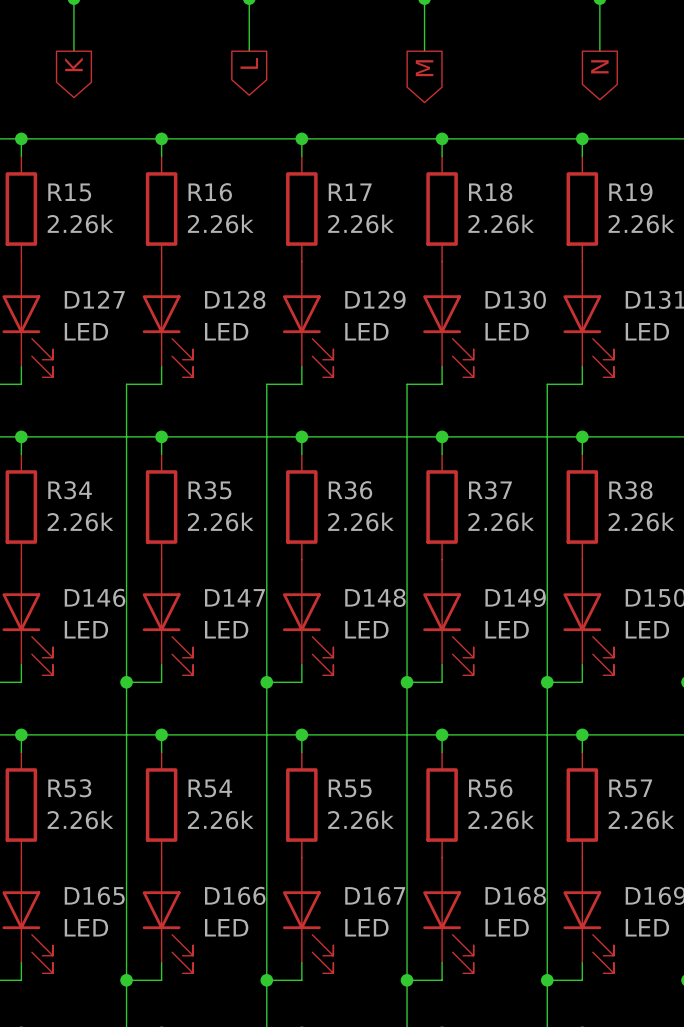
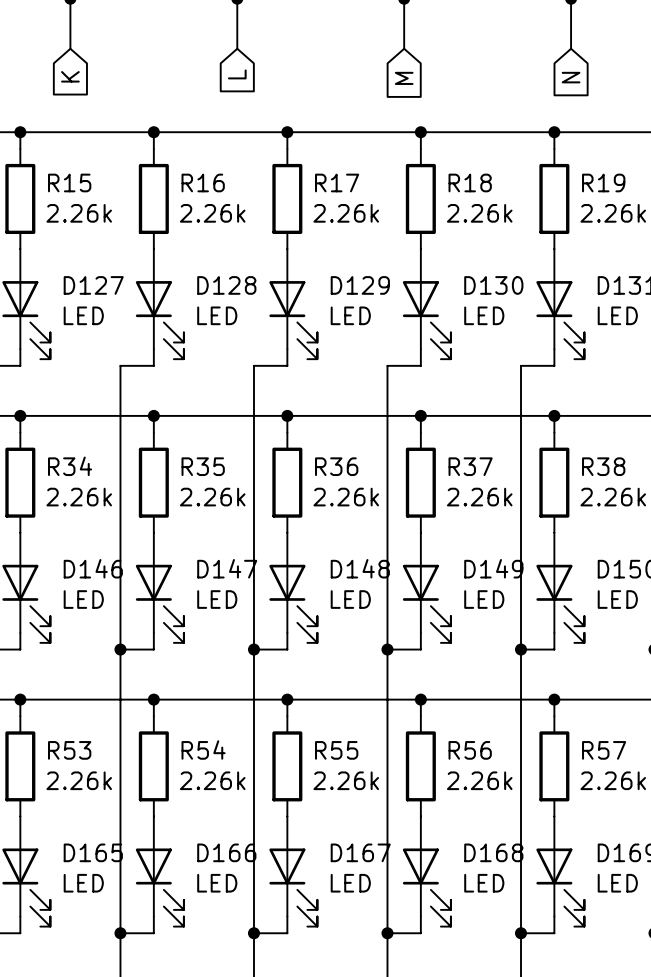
global label shape: output (249, 63) -> input (237, 74)
global label shape: output (73, 64) -> input (70, 76)
global label shape: output (599, 66) -> input (571, 77)
global label shape: output (424, 68) -> input (404, 78)

